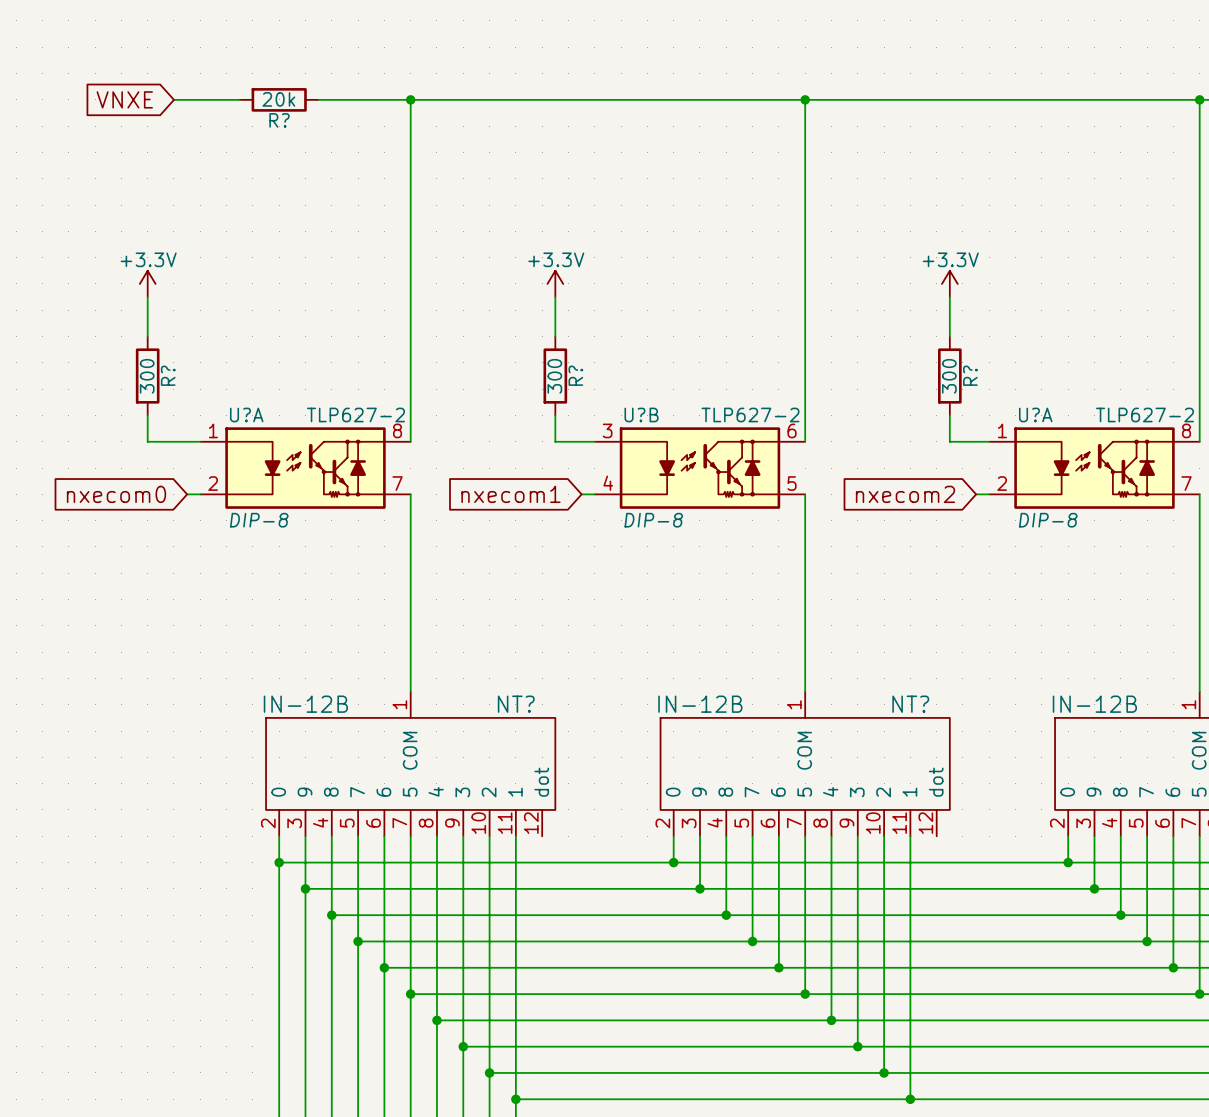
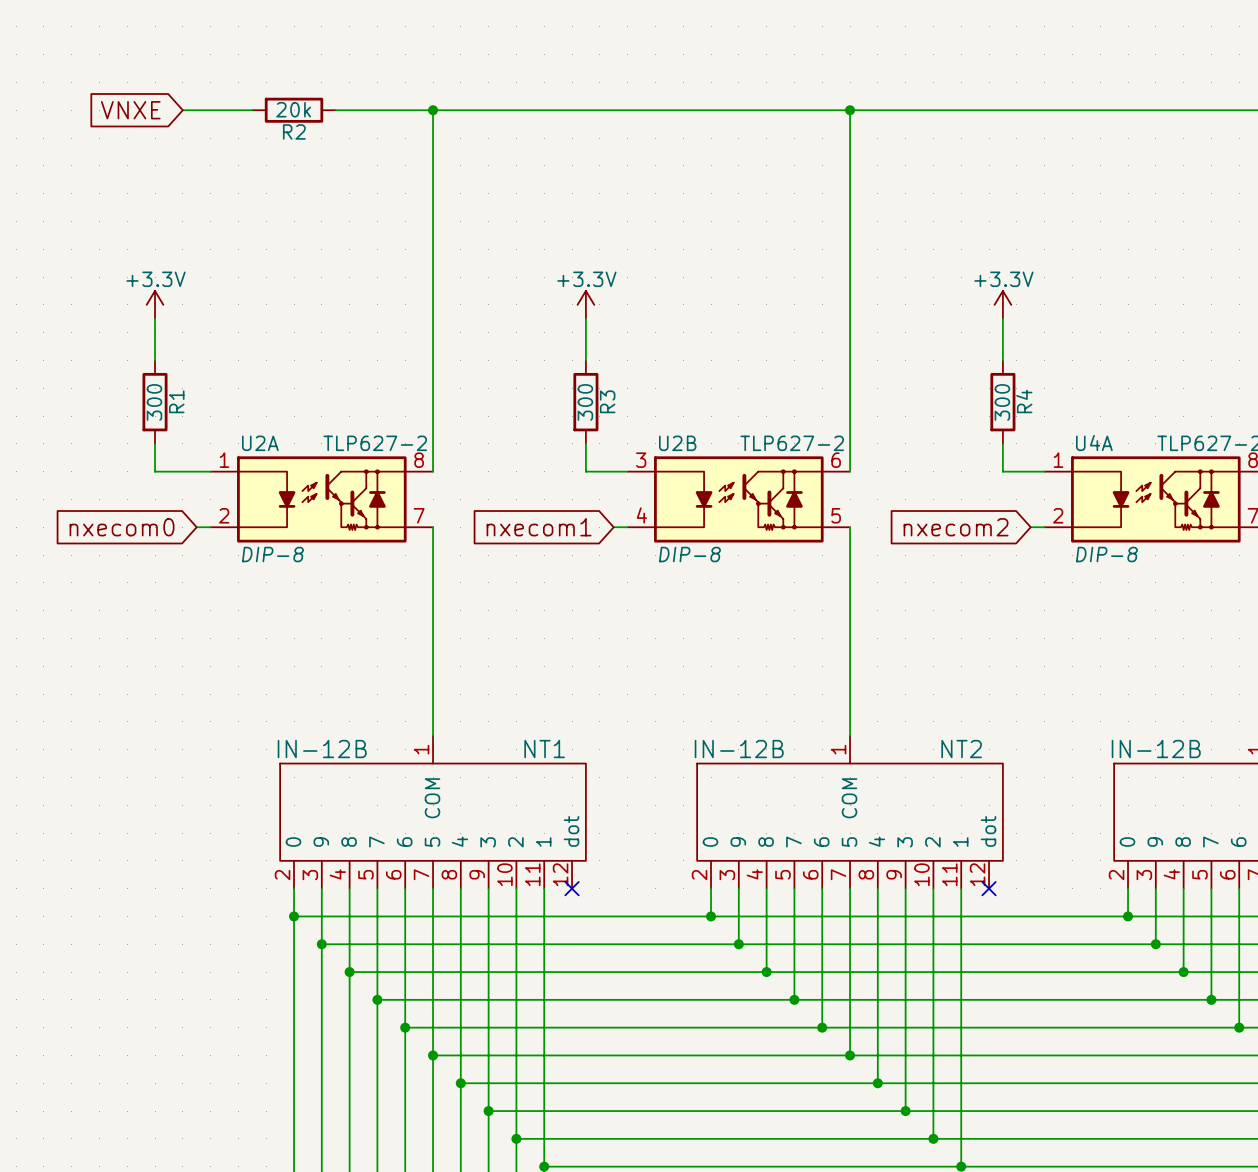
R? name: R? (279, 120) -> R2 (294, 131)
R? name: R? (168, 375) -> R1 (176, 401)
R? name: R? (575, 375) -> R3 (607, 401)
R? name: R? (970, 375) -> R4 (1024, 401)
U?A name: U?A (246, 414) -> U2A (260, 443)
U?B name: U?B (641, 414) -> U2B (677, 443)
U?A name: U?A (1035, 414) -> U4A (1094, 442)
NT? name: NT? (516, 704) -> NT1 (544, 749)
NT? name: NT? (910, 704) -> NT2 (961, 749)
no-connect mark: none -> (572, 888)
no-connect mark: none -> (989, 888)

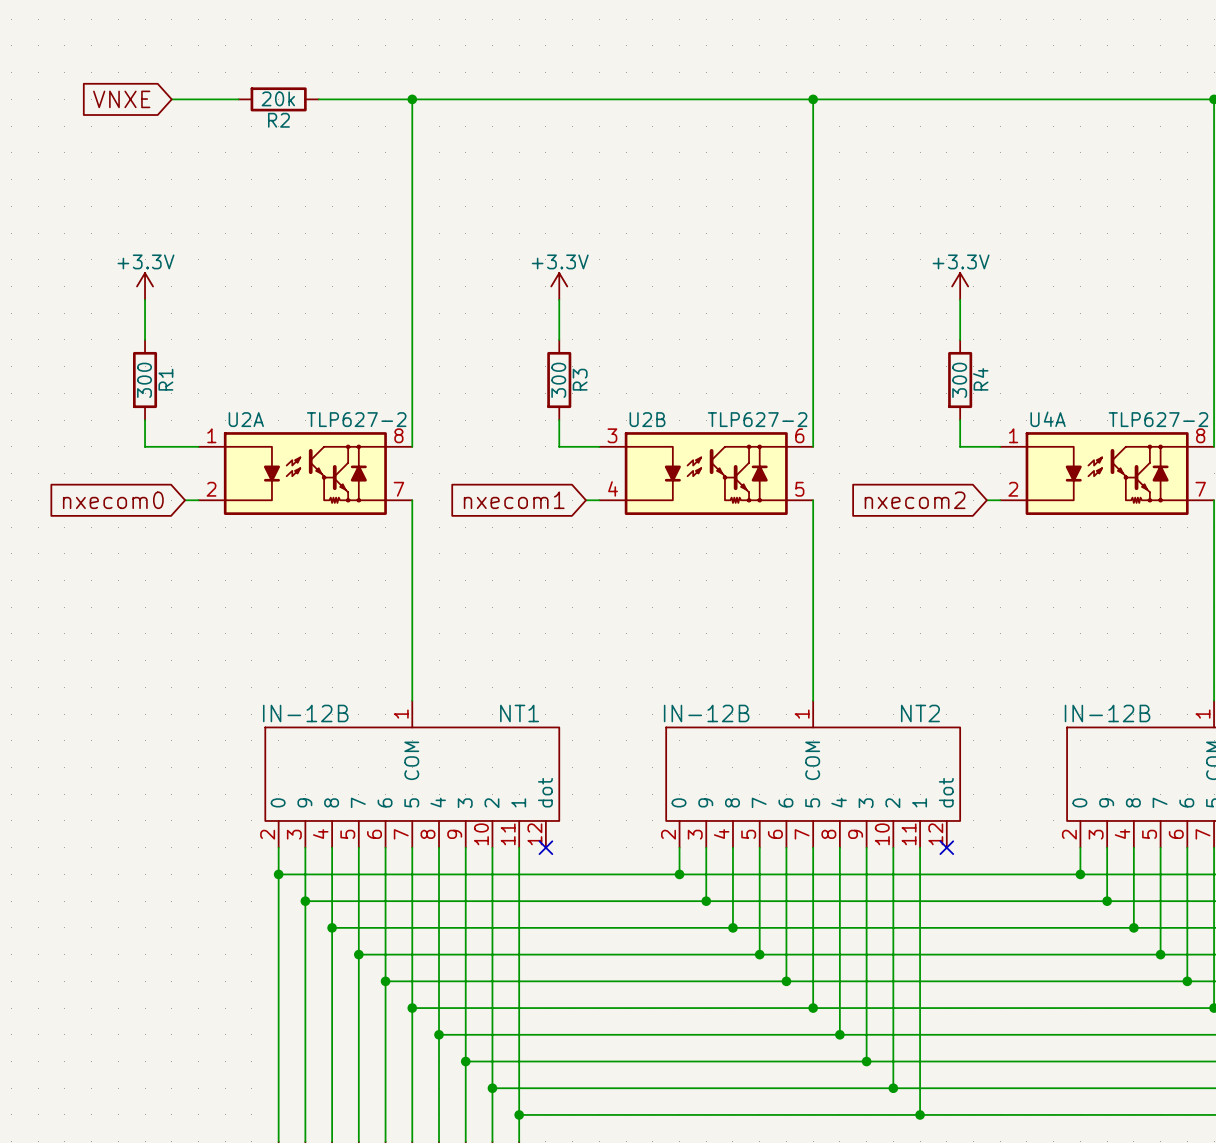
U2A text: DIP-8 (272, 554) -> none
U2B text: DIP-8 (689, 554) -> none
U4A text: DIP-8 (1106, 554) -> none

